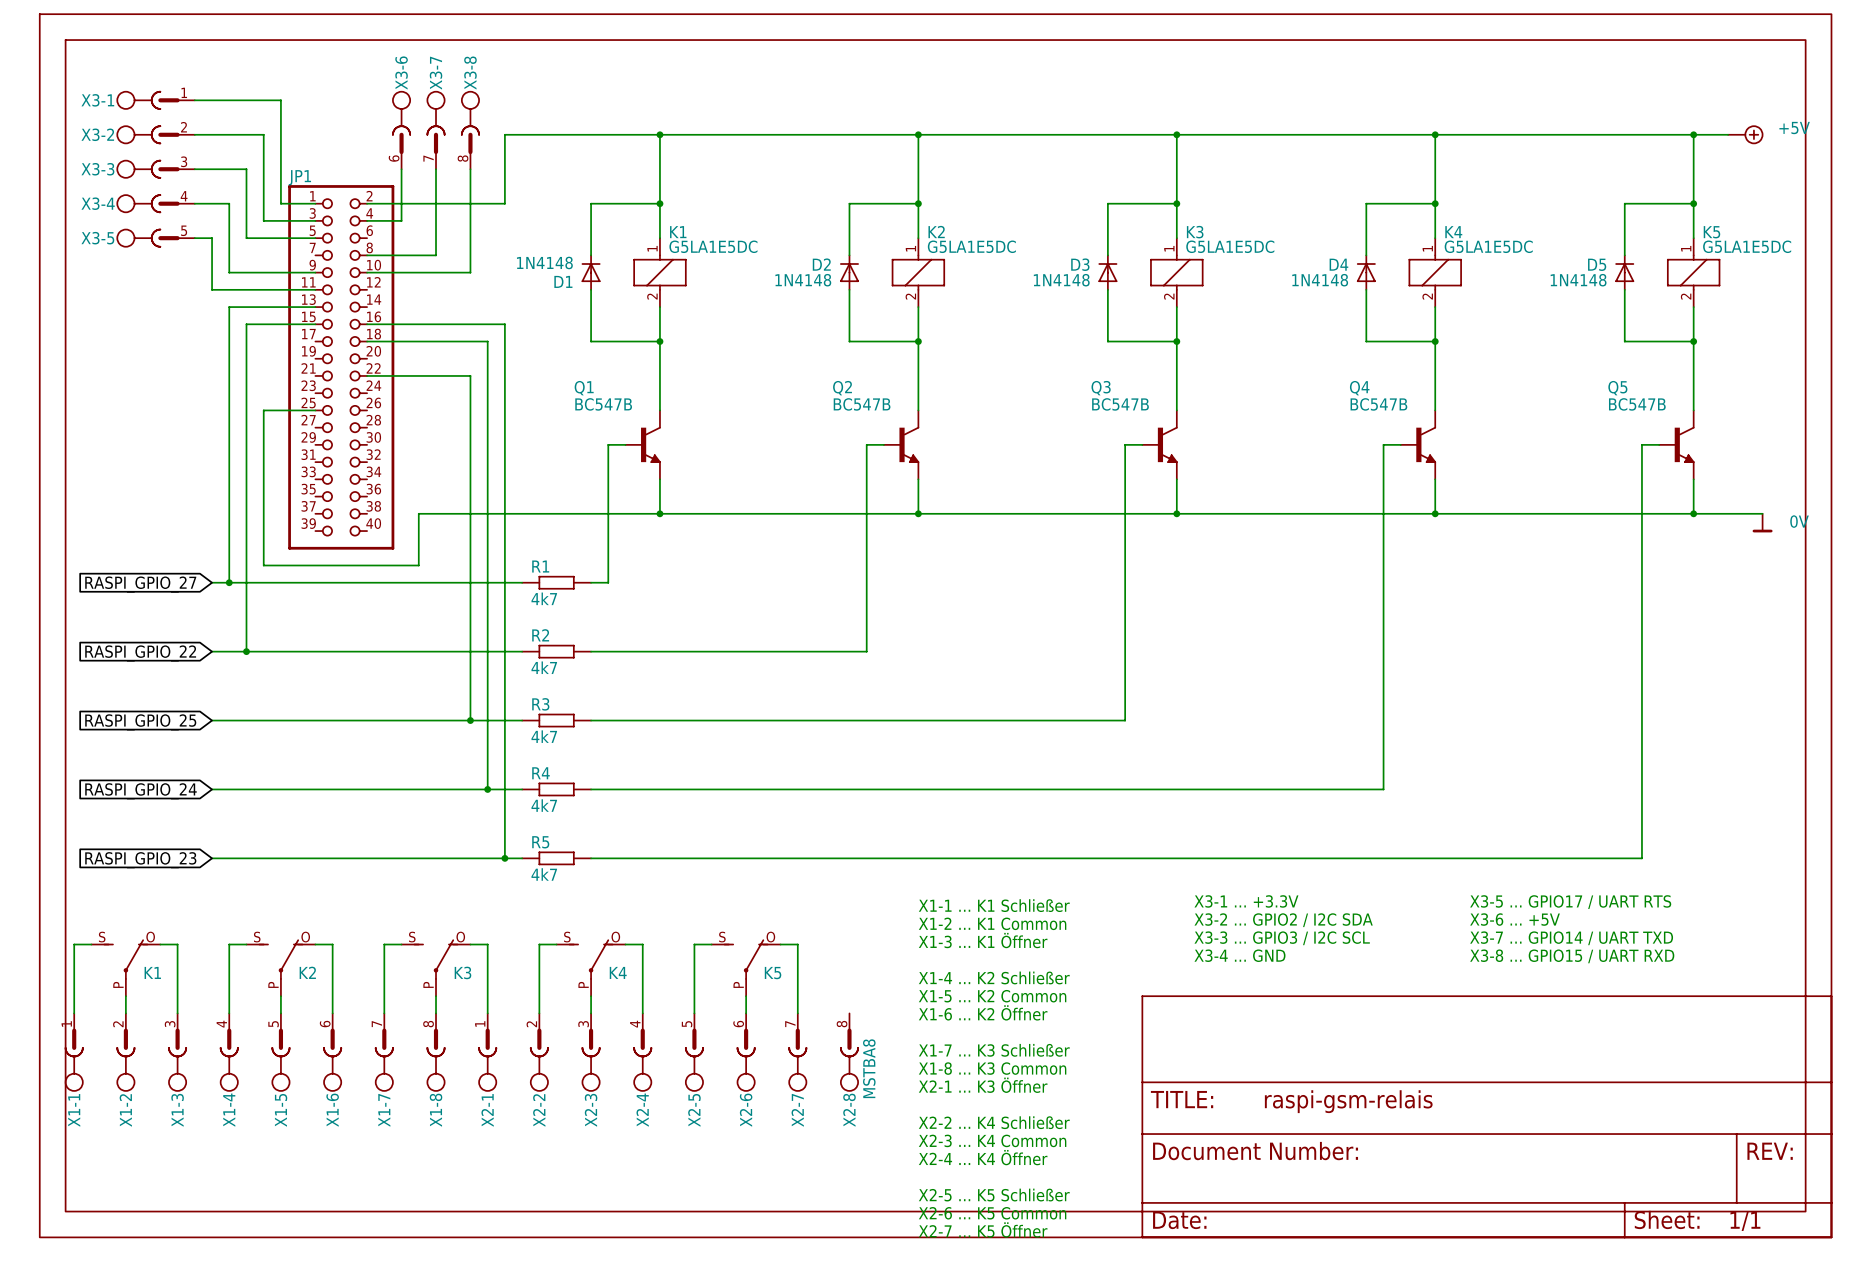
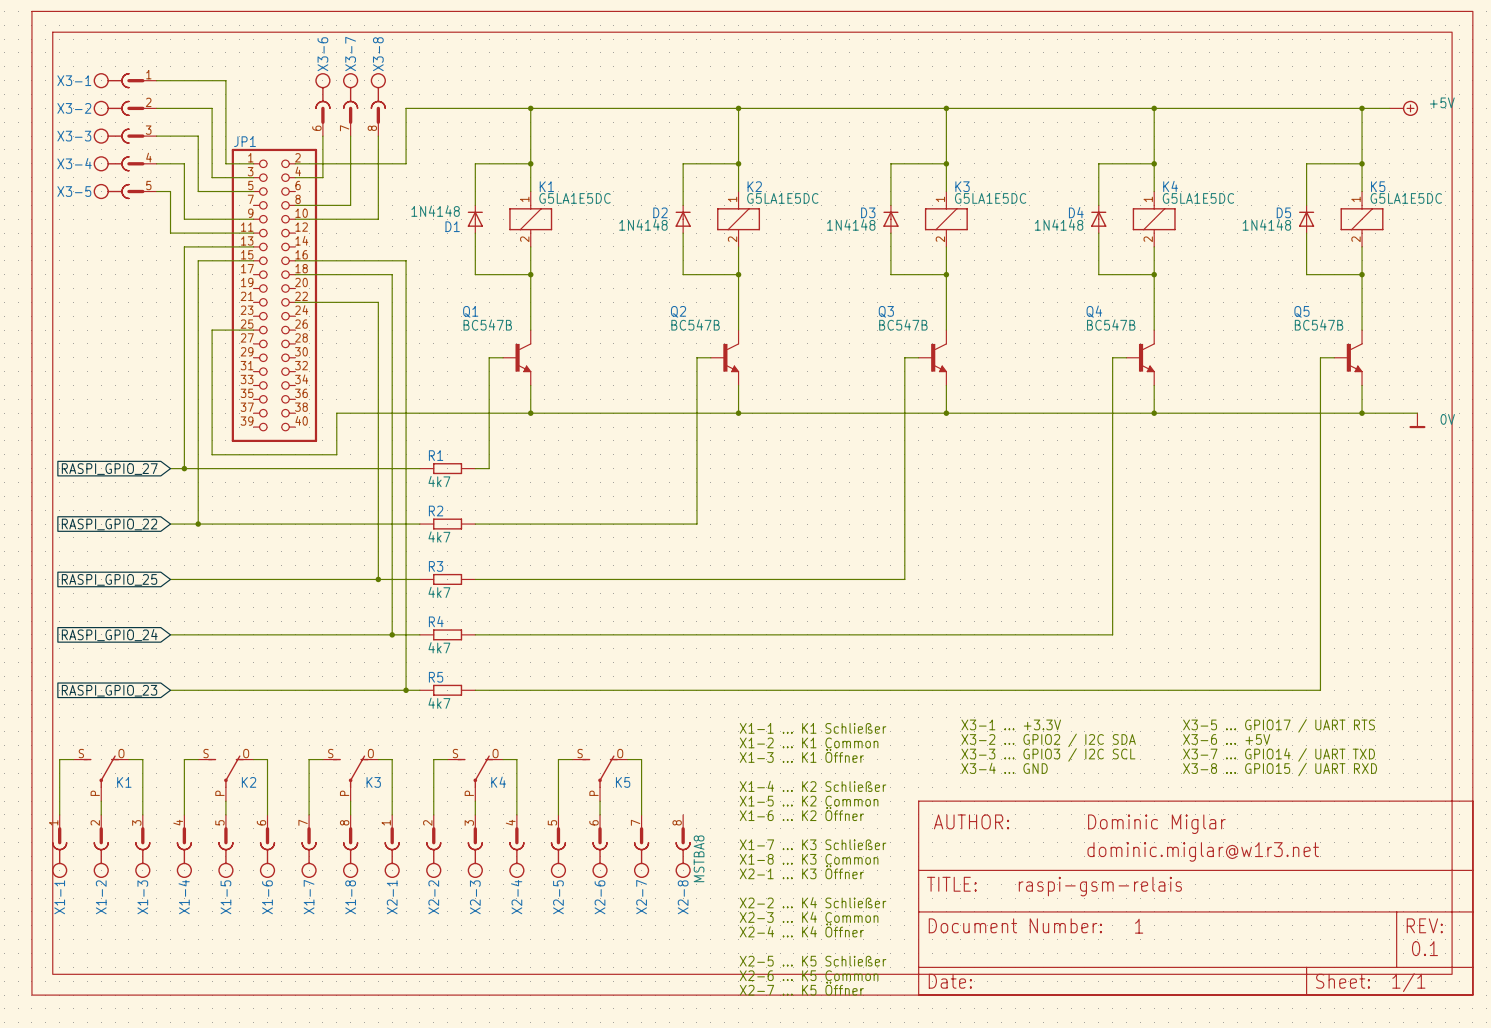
text: none -> AUTHOR: (971, 821)
text: none -> Dominic Miglar (1156, 824)
text: none -> dominic.miglar@w1r3.net (1203, 851)
text: none -> 1 (1139, 926)
text: none -> 0.1 (1424, 948)

